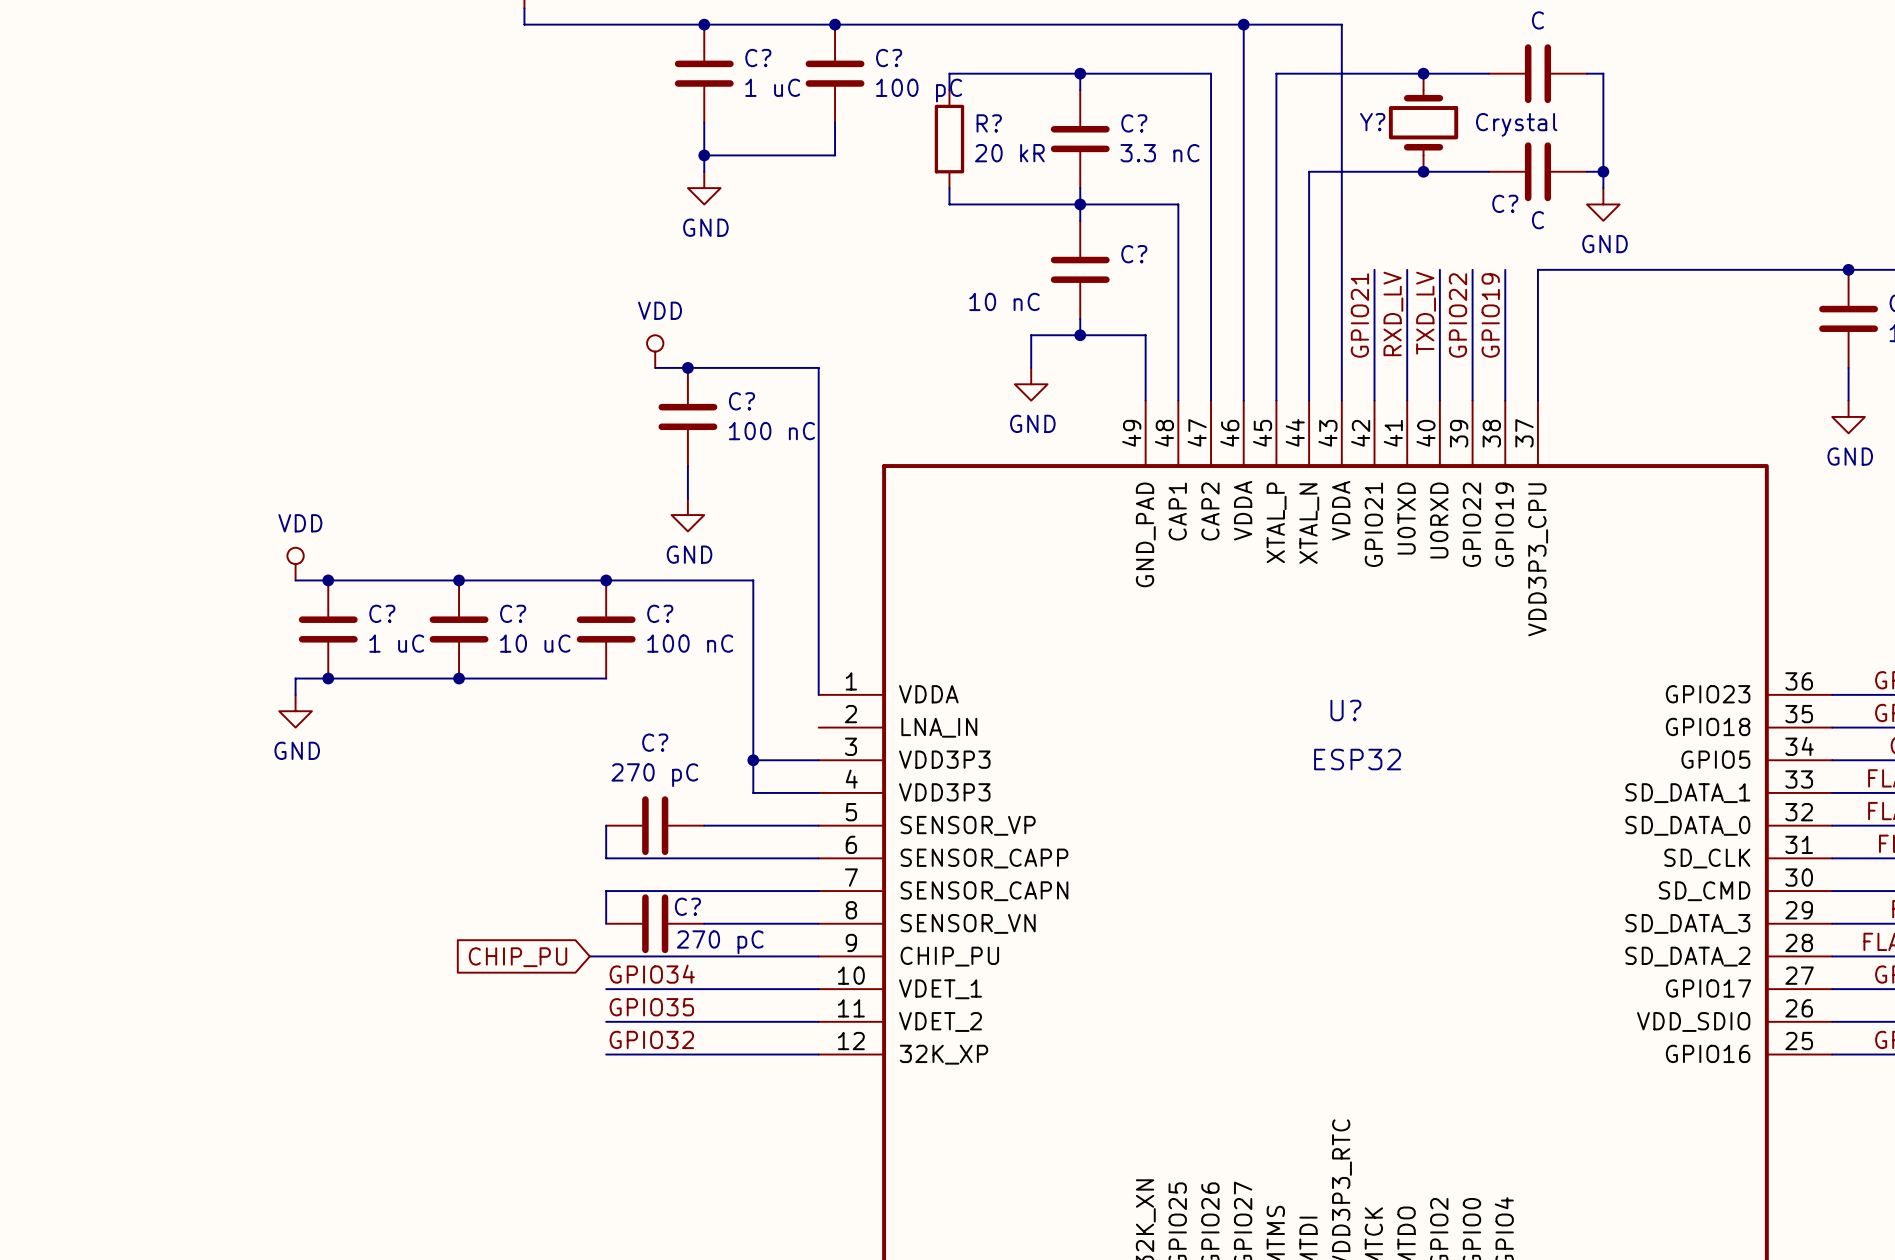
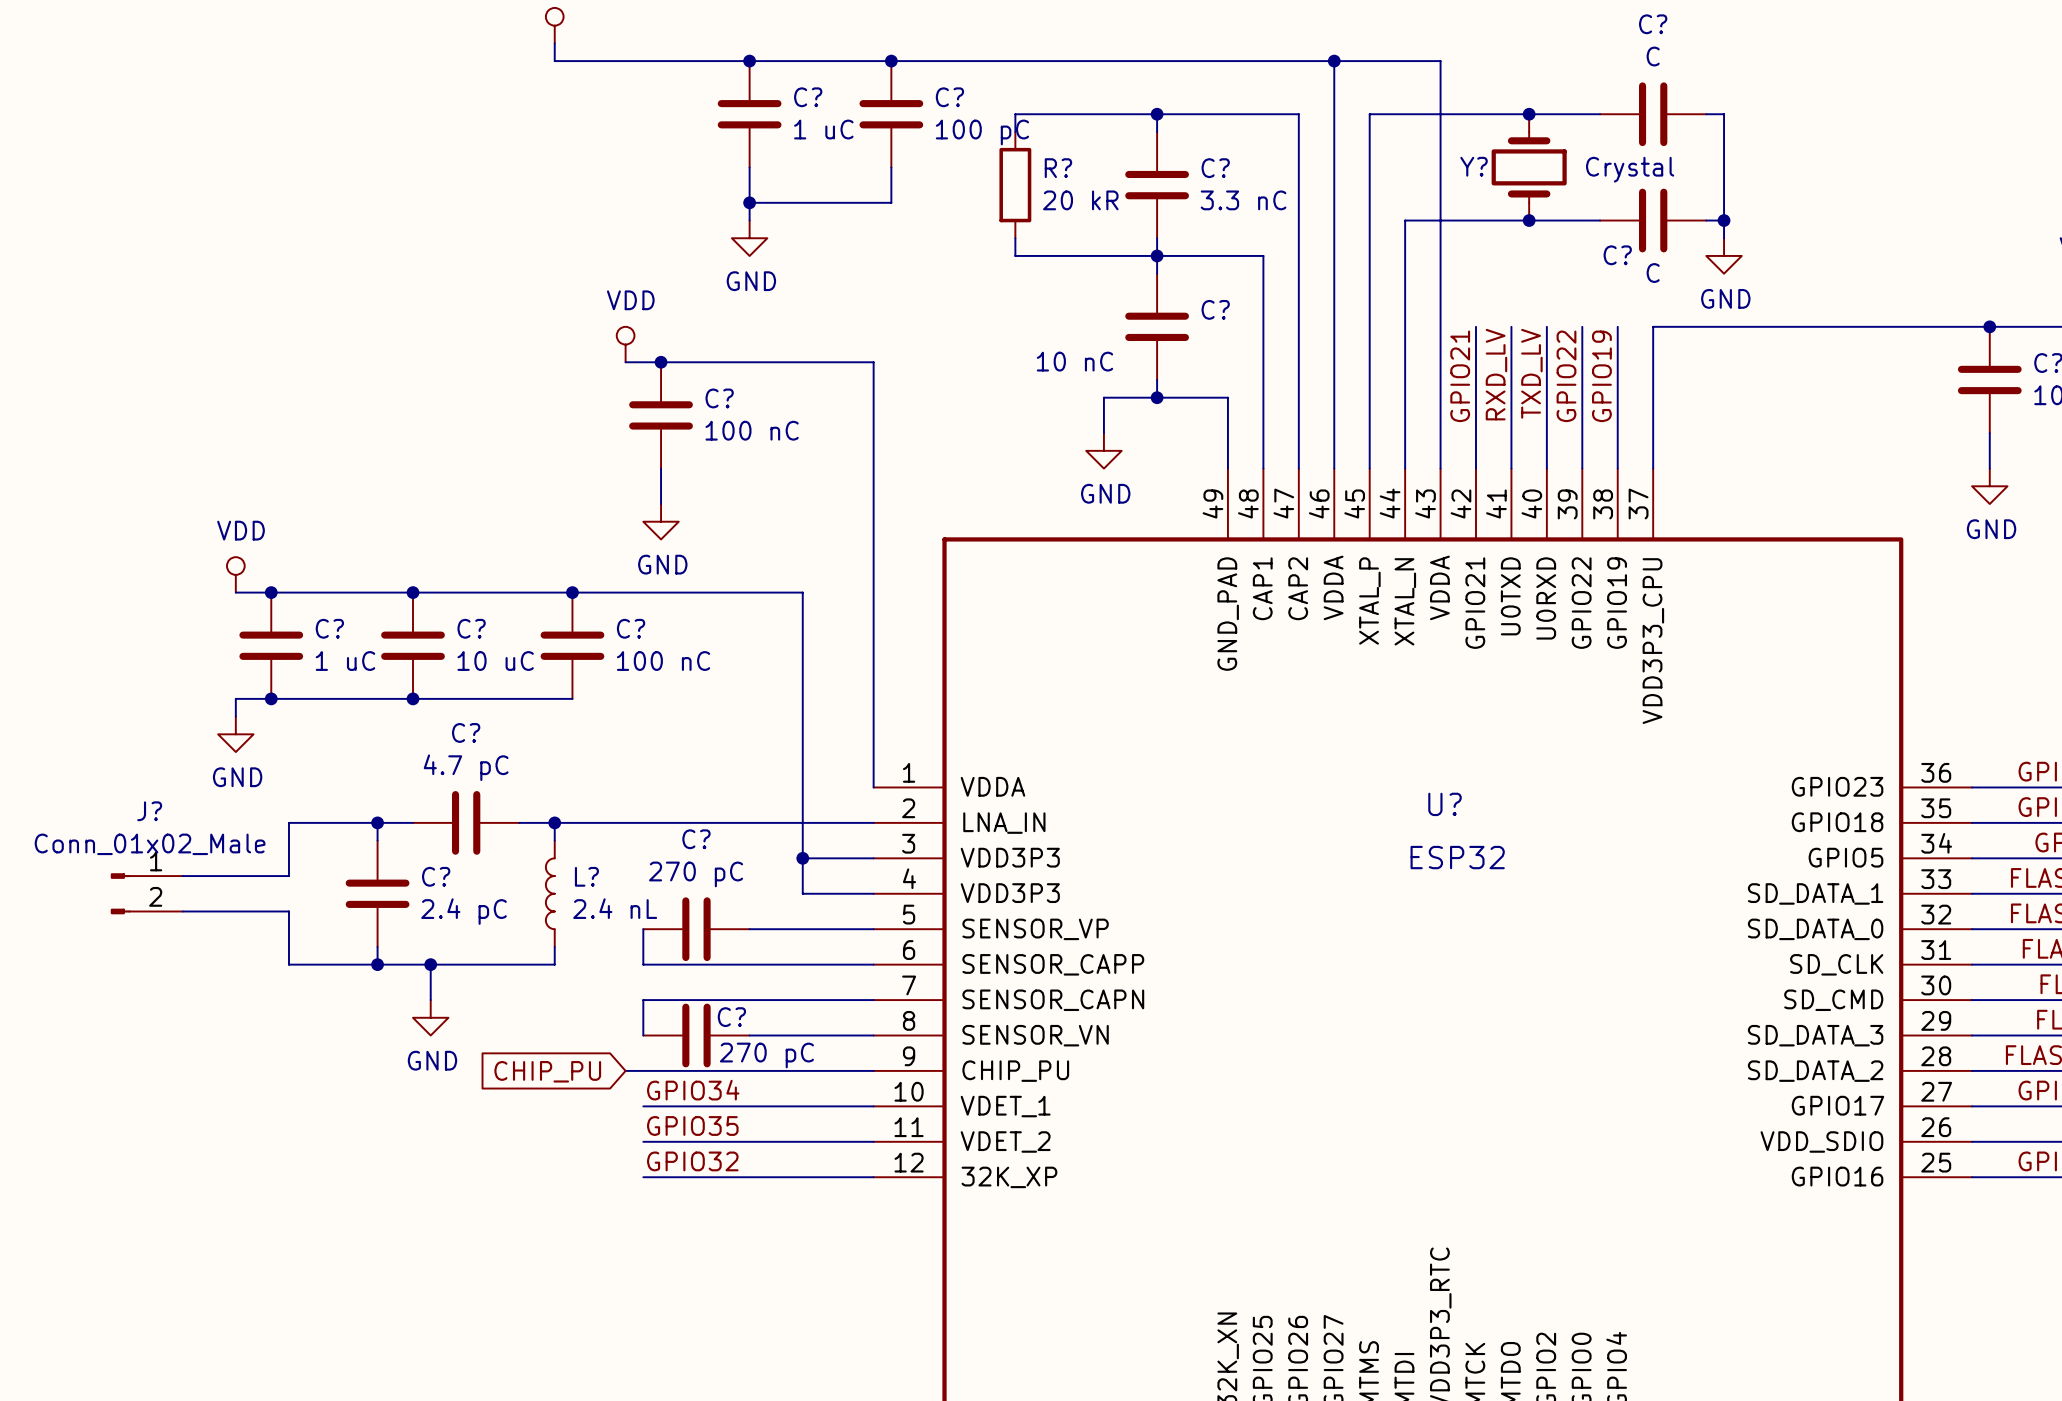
junction: none -> (661, 362)
power symbol position: VDD (655, 351) -> VDD (625, 344)
wire: (655, 367) (818, 367) -> (625, 362) (873, 362) (873, 433)
junction: (687, 367) -> none
C? position: (687, 416) -> (661, 415)
wire: (687, 466) (687, 498) -> (661, 468) (661, 504)
junction: none -> (271, 592)
junction: none -> (413, 592)
junction: none -> (572, 592)
power symbol position: GND (687, 515) -> GND (661, 521)
power symbol position: VDD (295, 564) -> VDD (235, 574)
wire: (295, 580) (753, 580) -> (235, 592) (802, 592) (802, 663)
junction: (328, 580) -> none
junction: (459, 580) -> none
junction: (606, 580) -> none
junction: none -> (271, 698)
junction: none -> (413, 698)
C? position: (328, 629) -> (271, 645)
C? position: (459, 629) -> (413, 645)
C? position: (606, 629) -> (572, 645)
junction: (328, 678) -> none
junction: (459, 678) -> none
wire: (606, 678) (295, 678) (295, 694) -> (572, 698) (235, 698) (235, 716)
power symbol position: GND (295, 711) -> GND (235, 734)
wire: none -> (377, 822) (377, 840)
junction: none -> (377, 822)
wire: none -> (413, 822) (288, 822) (288, 876) (182, 876)
C?: none -> 4.7 pC (466, 822)
wire: none -> (519, 822) (873, 822)
wire: none -> (554, 822) (554, 840)
junction: none -> (554, 822)
J?: none -> Conn_01x02_Male (146, 893)
C?: none -> 2.4 pC (377, 893)
L?: none -> 2.4 nL (550, 893)
wire: none -> (182, 911) (288, 911) (288, 964) (554, 964) (554, 946)
wire: none -> (377, 946) (377, 964)
junction: none -> (377, 964)
wire: none -> (430, 964) (430, 1000)
junction: none -> (430, 964)
power symbol: none -> GND (430, 1017)

